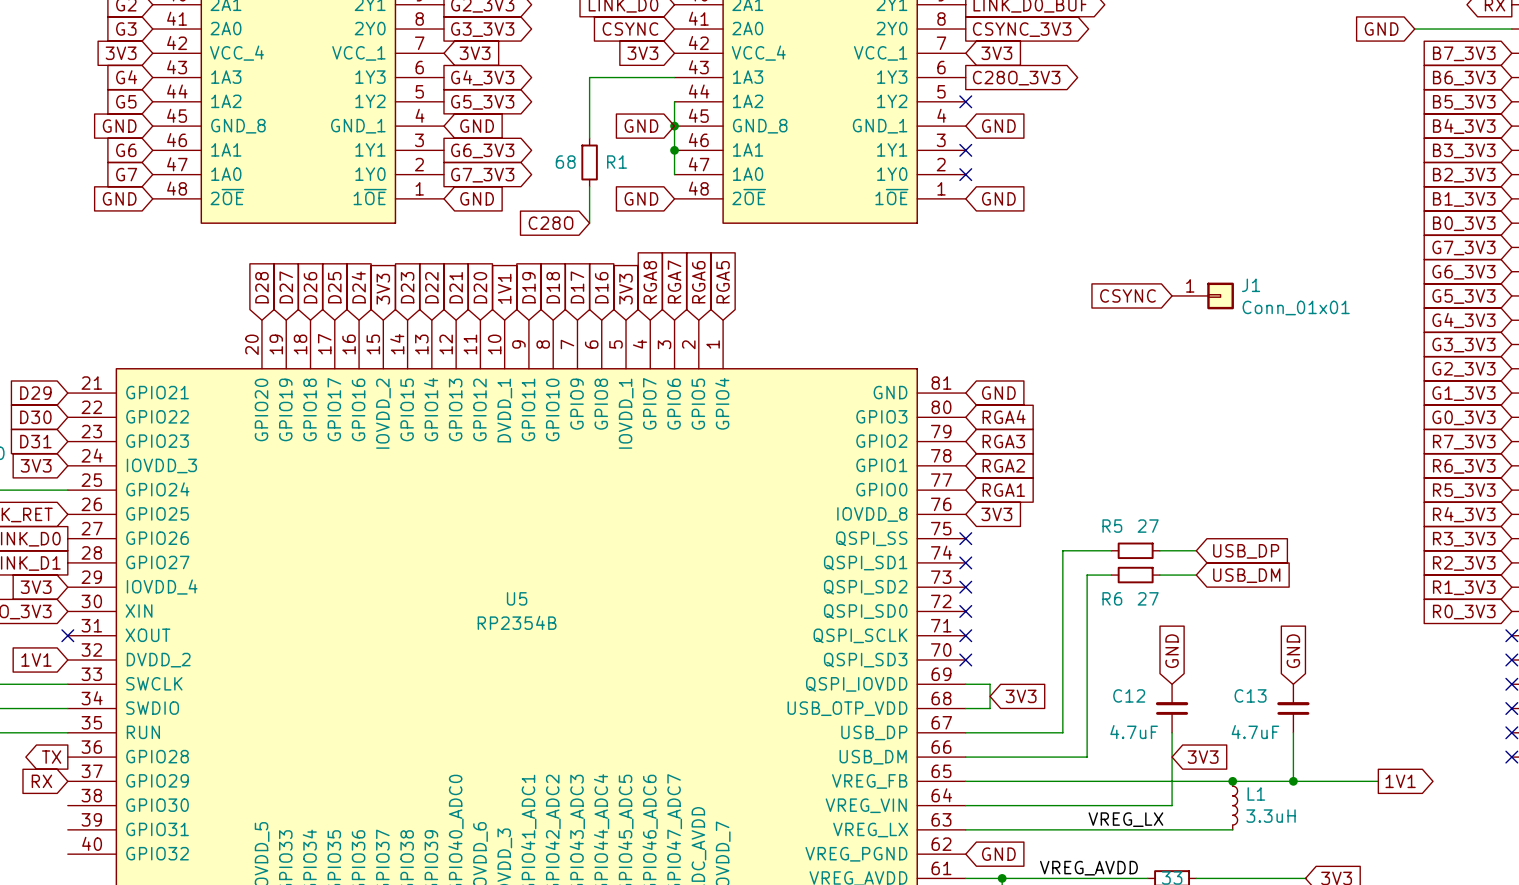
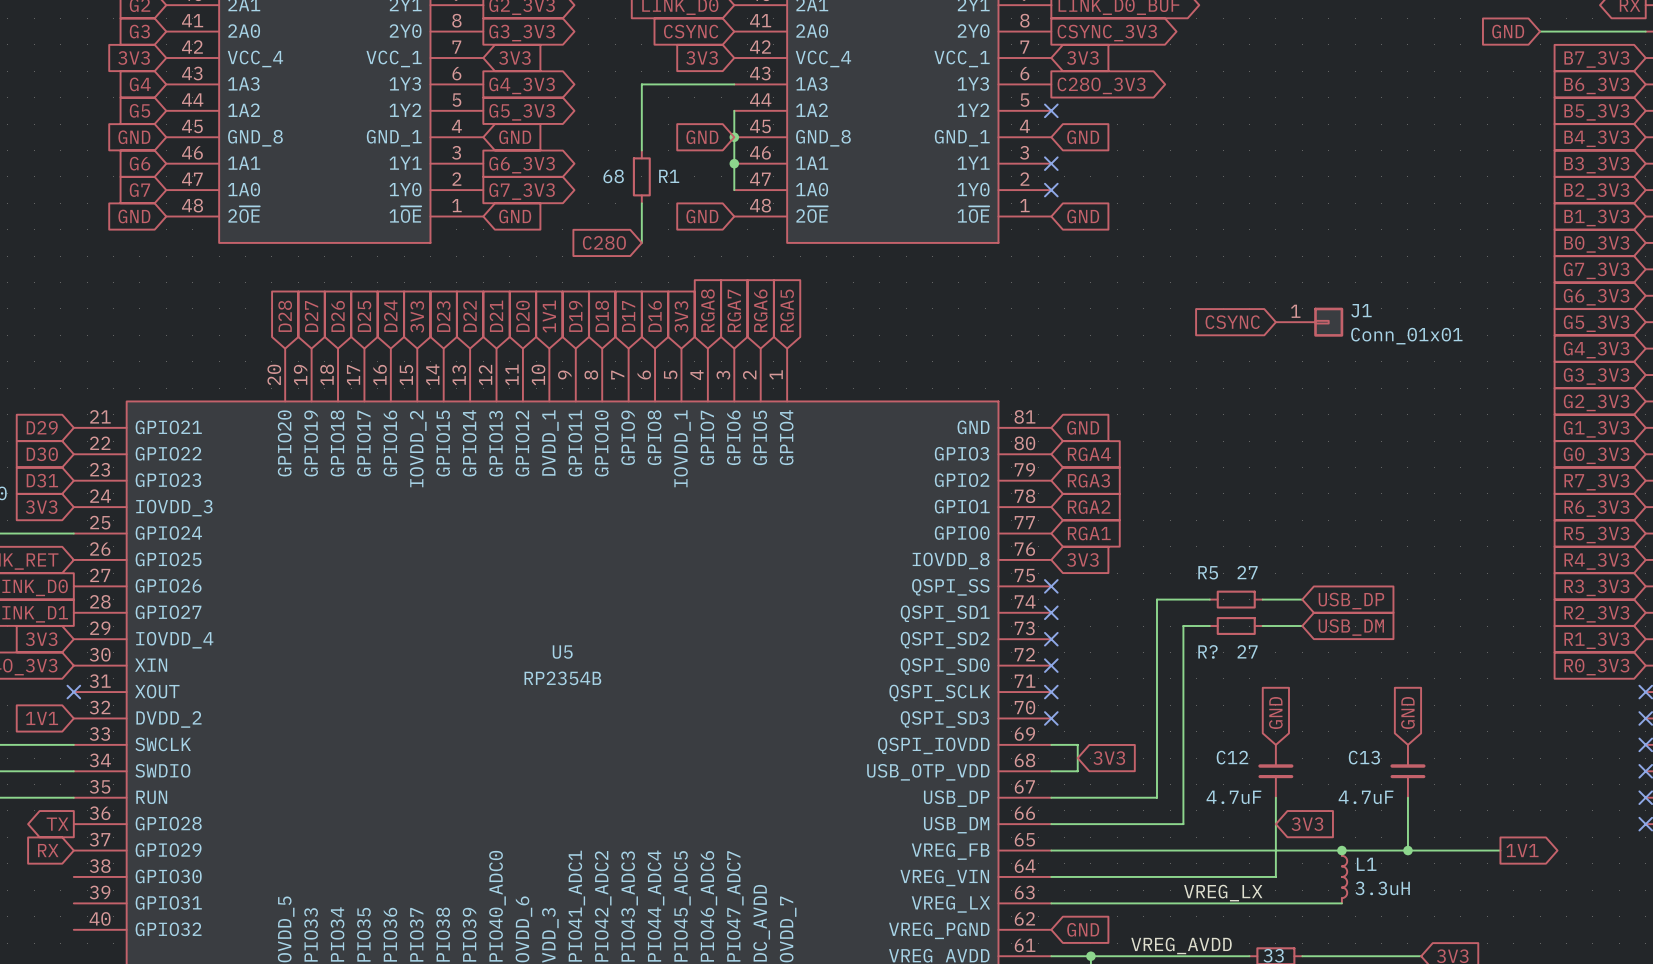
R6 name: R6 (1112, 598) -> R? (1207, 651)

